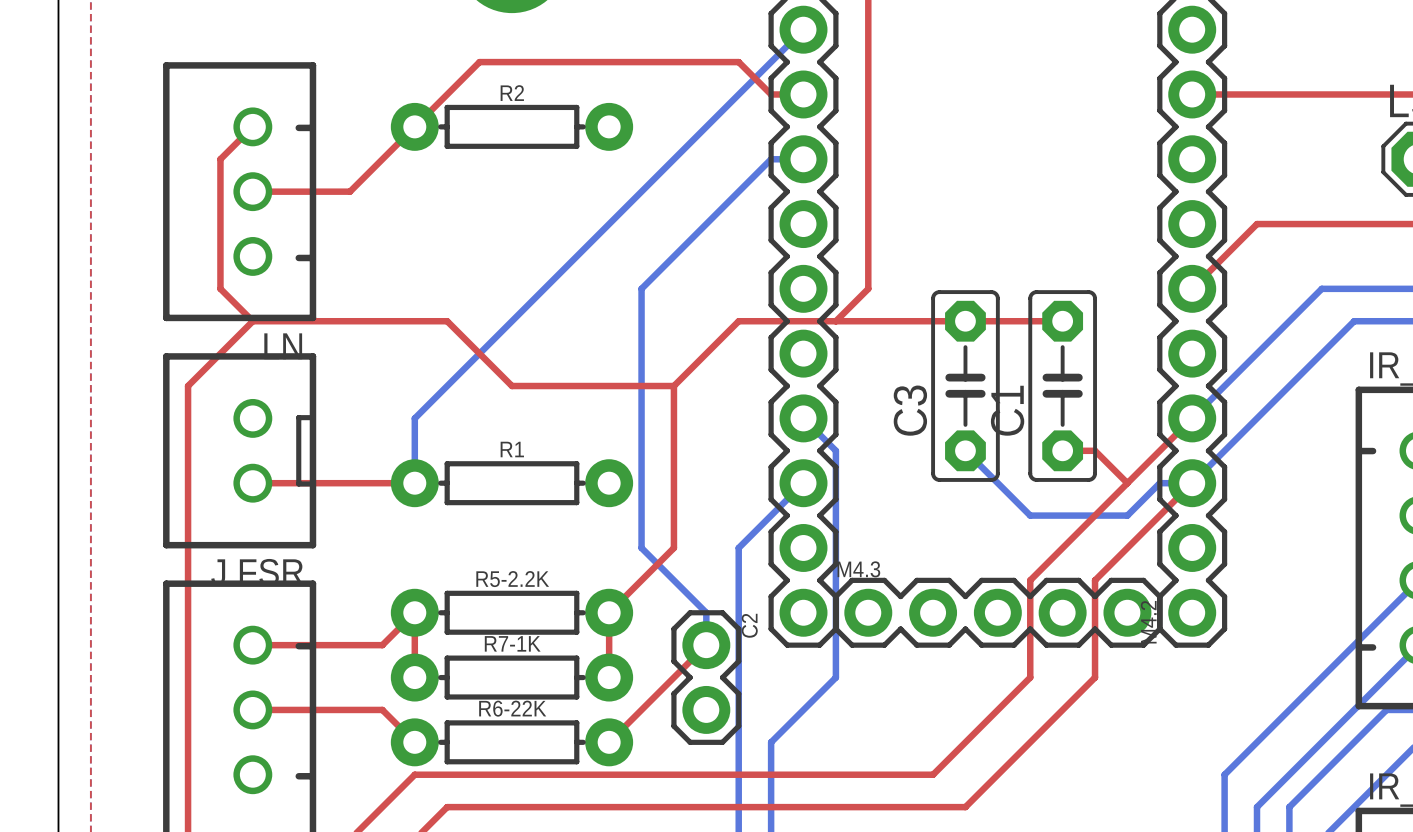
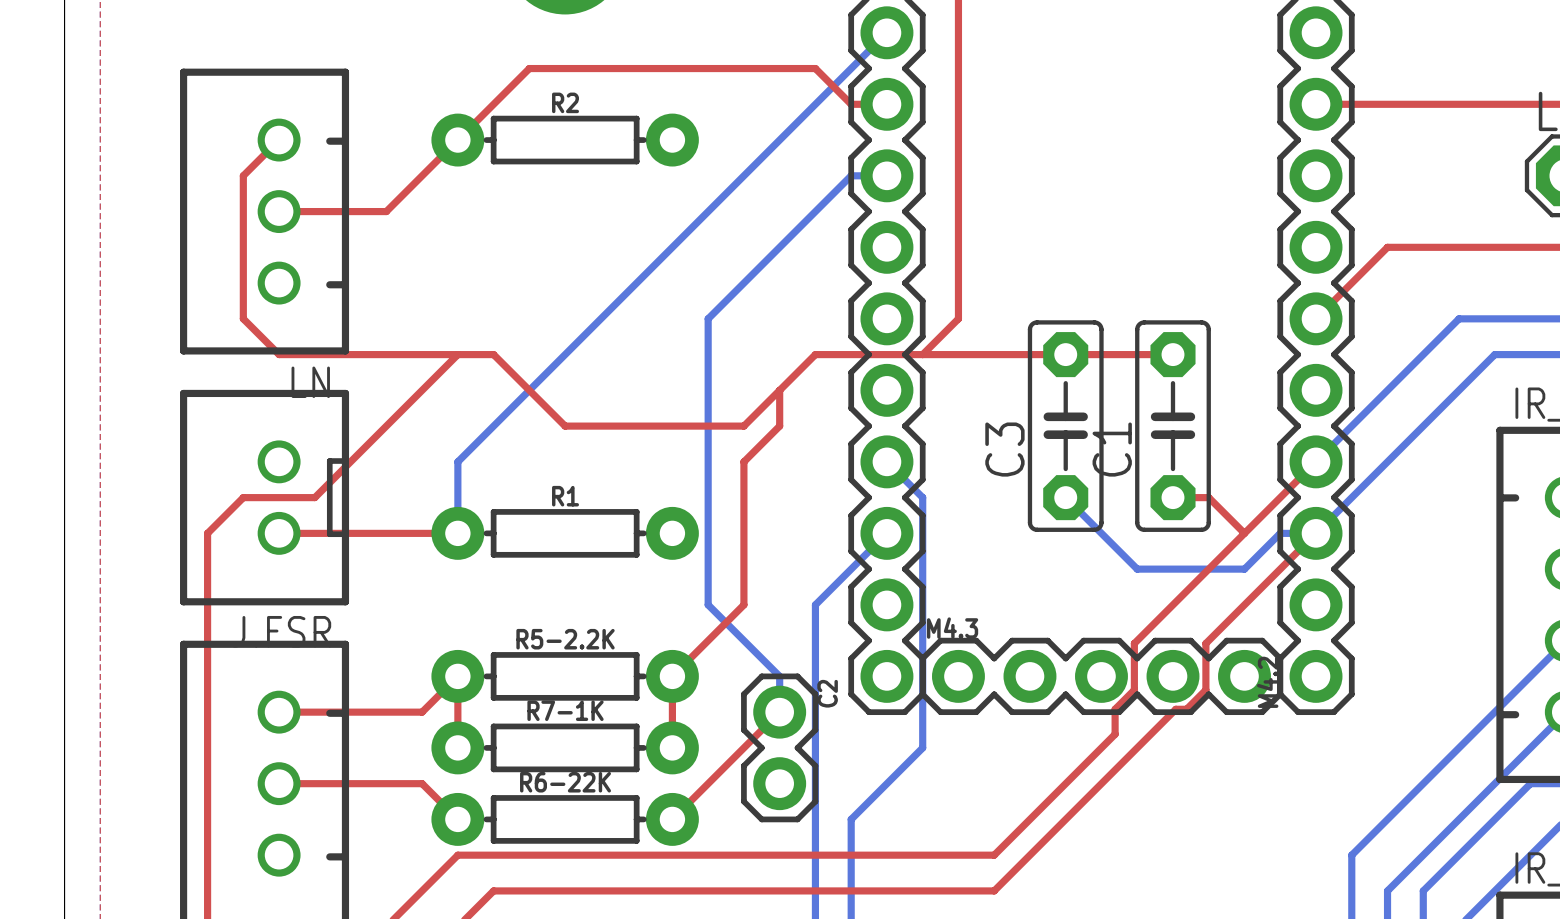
top track: (252, 321) (188, 386) (188, 483) -> (457, 354) (314, 497) (243, 497) (207, 533)
top track: (673, 386) (673, 418) -> (779, 390) (779, 426) (743, 461)
top track: (1030, 580) (1030, 677) -> (1208, 640) (1205, 643) (1205, 690) (1186, 709) (1175, 709) (1137, 747)
top track: none -> (1137, 640) (1134, 643) (1134, 690) (1115, 709) (1115, 734) (994, 855)
top track: (1095, 580) (1095, 677) (965, 807) (900, 807) -> none
top track: (900, 774) (933, 774) -> (994, 890) (1029, 855)

